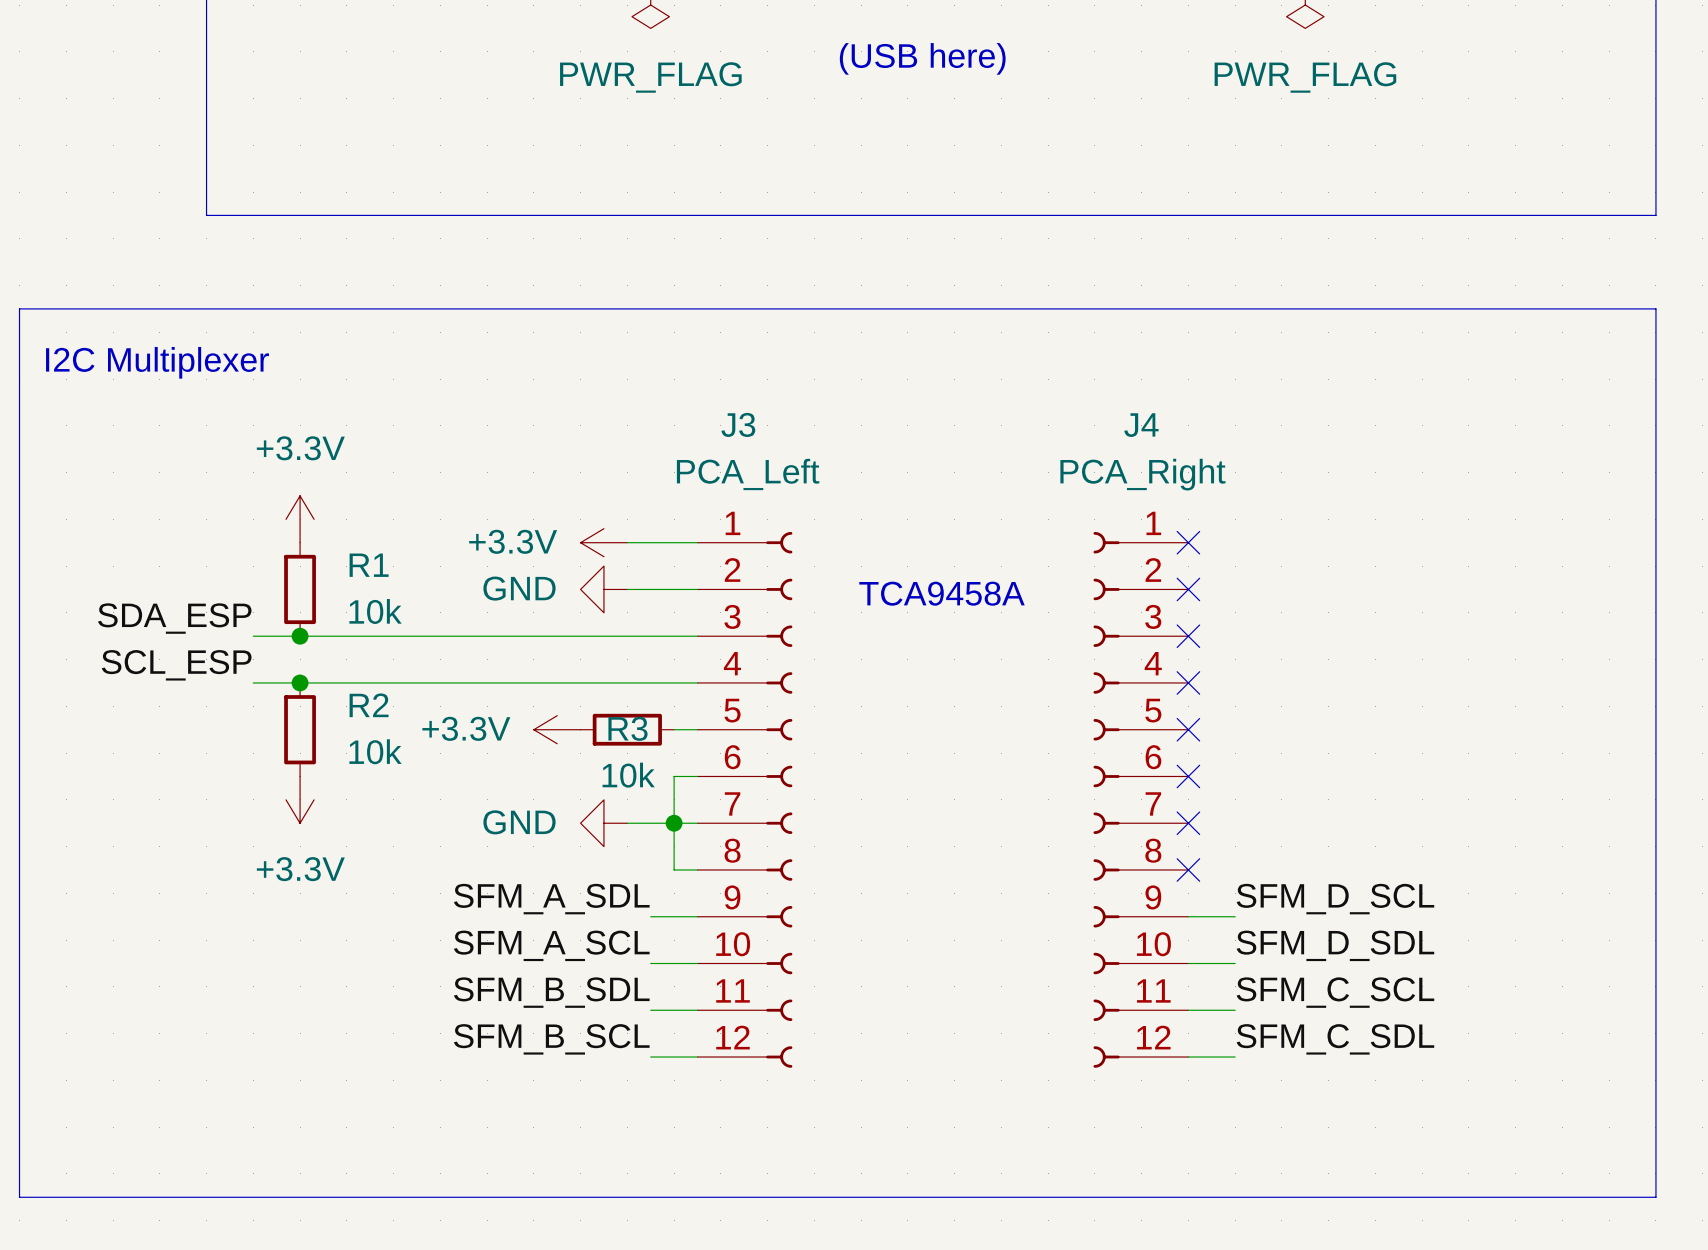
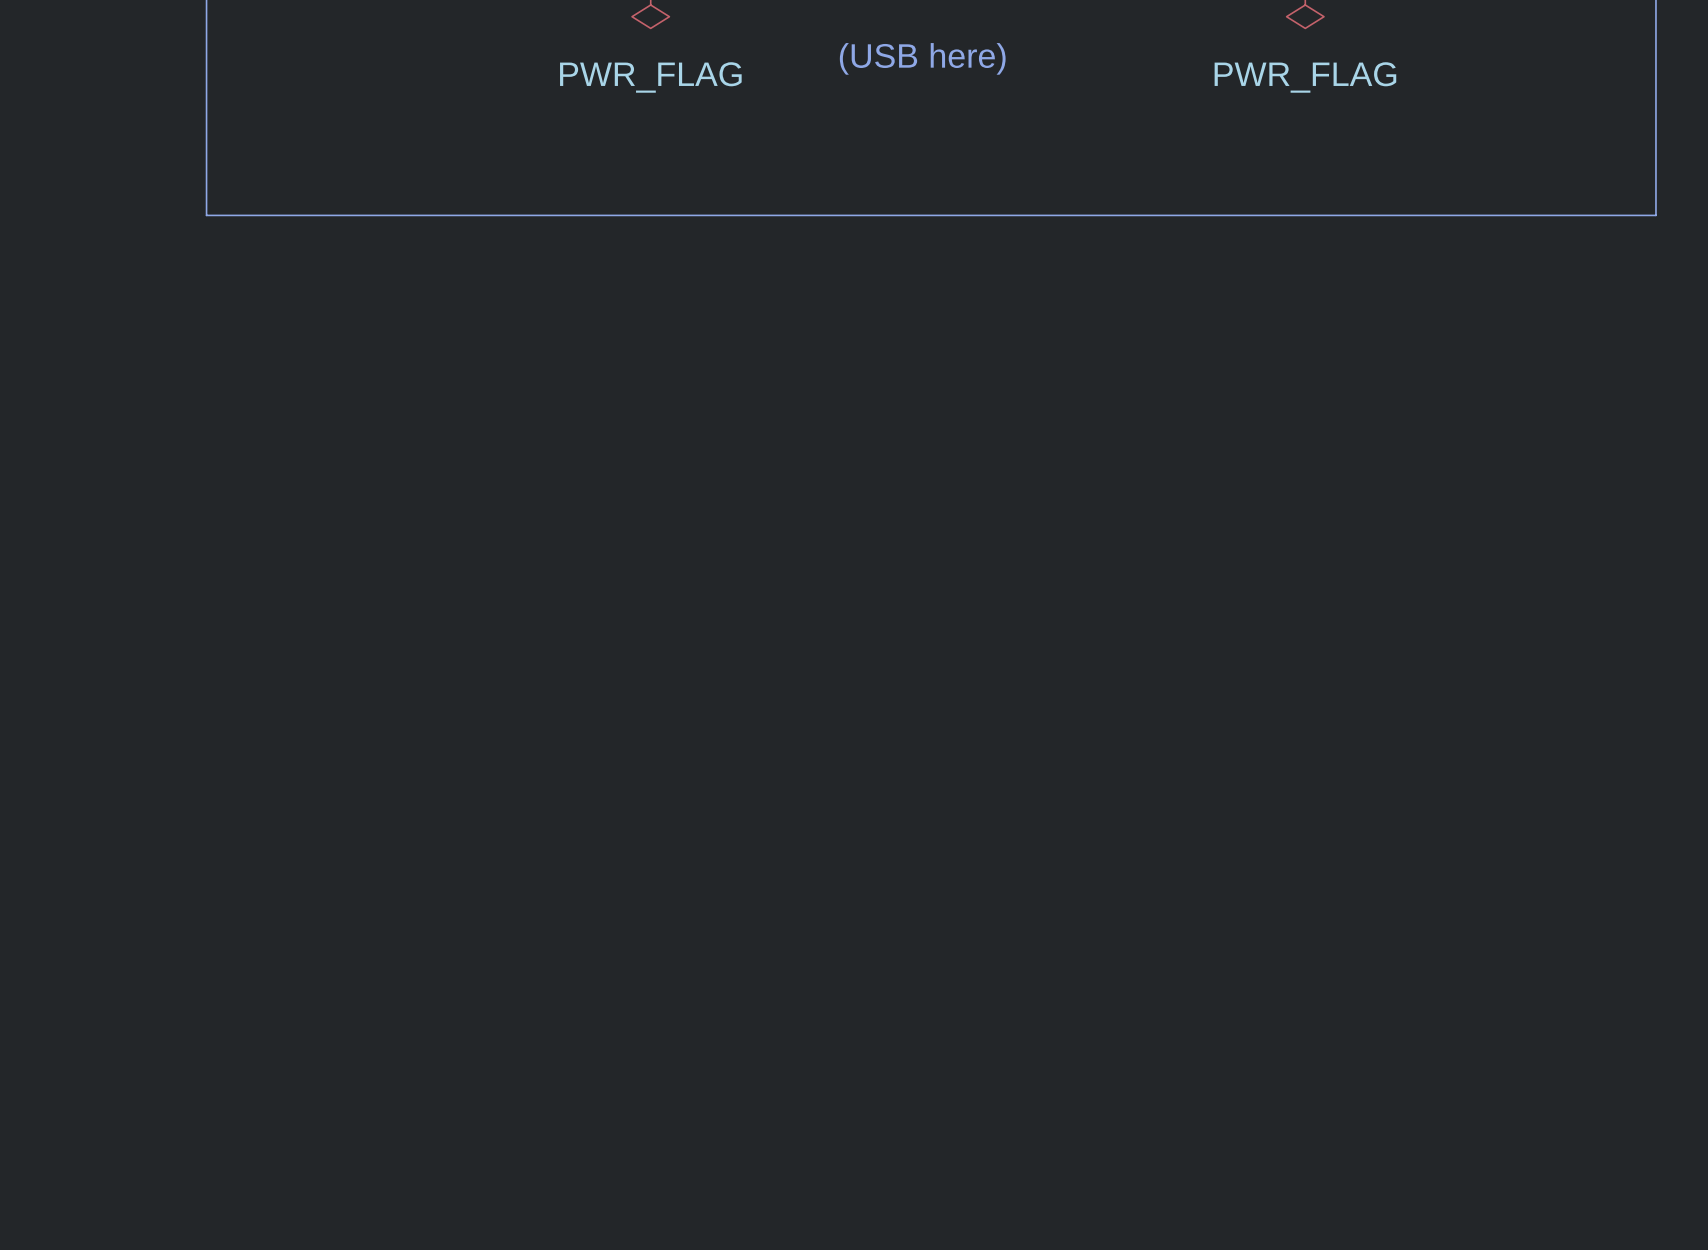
line: (19, 308) (19, 1197) (1655, 1197) (1655, 308) (19, 308) -> none
text: I2C Multiplexer (157, 362) -> none
power symbol: +3.3V (300, 519) -> none
power symbol: +3.3V (603, 542) -> none
wire: (627, 542) (697, 542) -> none
no-connect mark: (1188, 542) -> none
R1: 10k (300, 589) -> none
power symbol: GND (603, 589) -> none
wire: (627, 589) (697, 589) -> none
no-connect mark: (1188, 589) -> none
text: TCA9458A (942, 593) -> none
label: SDA_ESP (174, 618) -> none
wire: (253, 636) (697, 636) -> none
junction: (300, 636) -> none
no-connect mark: (1188, 636) -> none
label: SCL_ESP (176, 665) -> none
wire: (253, 682) (697, 682) -> none
junction: (300, 682) -> none
no-connect mark: (1188, 682) -> none
R2: 10k (300, 729) -> none
power symbol: +3.3V (557, 729) -> none
R3: 10k (627, 729) -> none
wire: (674, 729) (697, 729) -> none
no-connect mark: (1188, 729) -> none
wire: (697, 776) (674, 776) (674, 869) (697, 869) -> none
no-connect mark: (1188, 776) -> none
power symbol: +3.3V (300, 799) -> none
J3: PCA_Left (744, 799) -> none
J4: PCA_Right (1140, 799) -> none
power symbol: GND (603, 823) -> none
wire: (627, 823) (697, 823) -> none
junction: (674, 823) -> none
no-connect mark: (1188, 823) -> none
no-connect mark: (1188, 869) -> none
label: SFM_A_SDL (551, 899) -> none
label: SFM_D_SCL (1335, 899) -> none
wire: (650, 916) (697, 916) -> none
wire: (1188, 916) (1235, 916) -> none
label: SFM_A_SCL (551, 945) -> none
label: SFM_D_SDL (1335, 945) -> none
wire: (650, 963) (697, 963) -> none
wire: (1188, 963) (1235, 963) -> none
label: SFM_B_SDL (551, 992) -> none
label: SFM_C_SCL (1335, 992) -> none
wire: (650, 1010) (697, 1010) -> none
wire: (1188, 1010) (1235, 1010) -> none
label: SFM_B_SCL (551, 1039) -> none
label: SFM_C_SDL (1335, 1039) -> none
wire: (650, 1057) (697, 1057) -> none
wire: (1188, 1057) (1235, 1057) -> none

